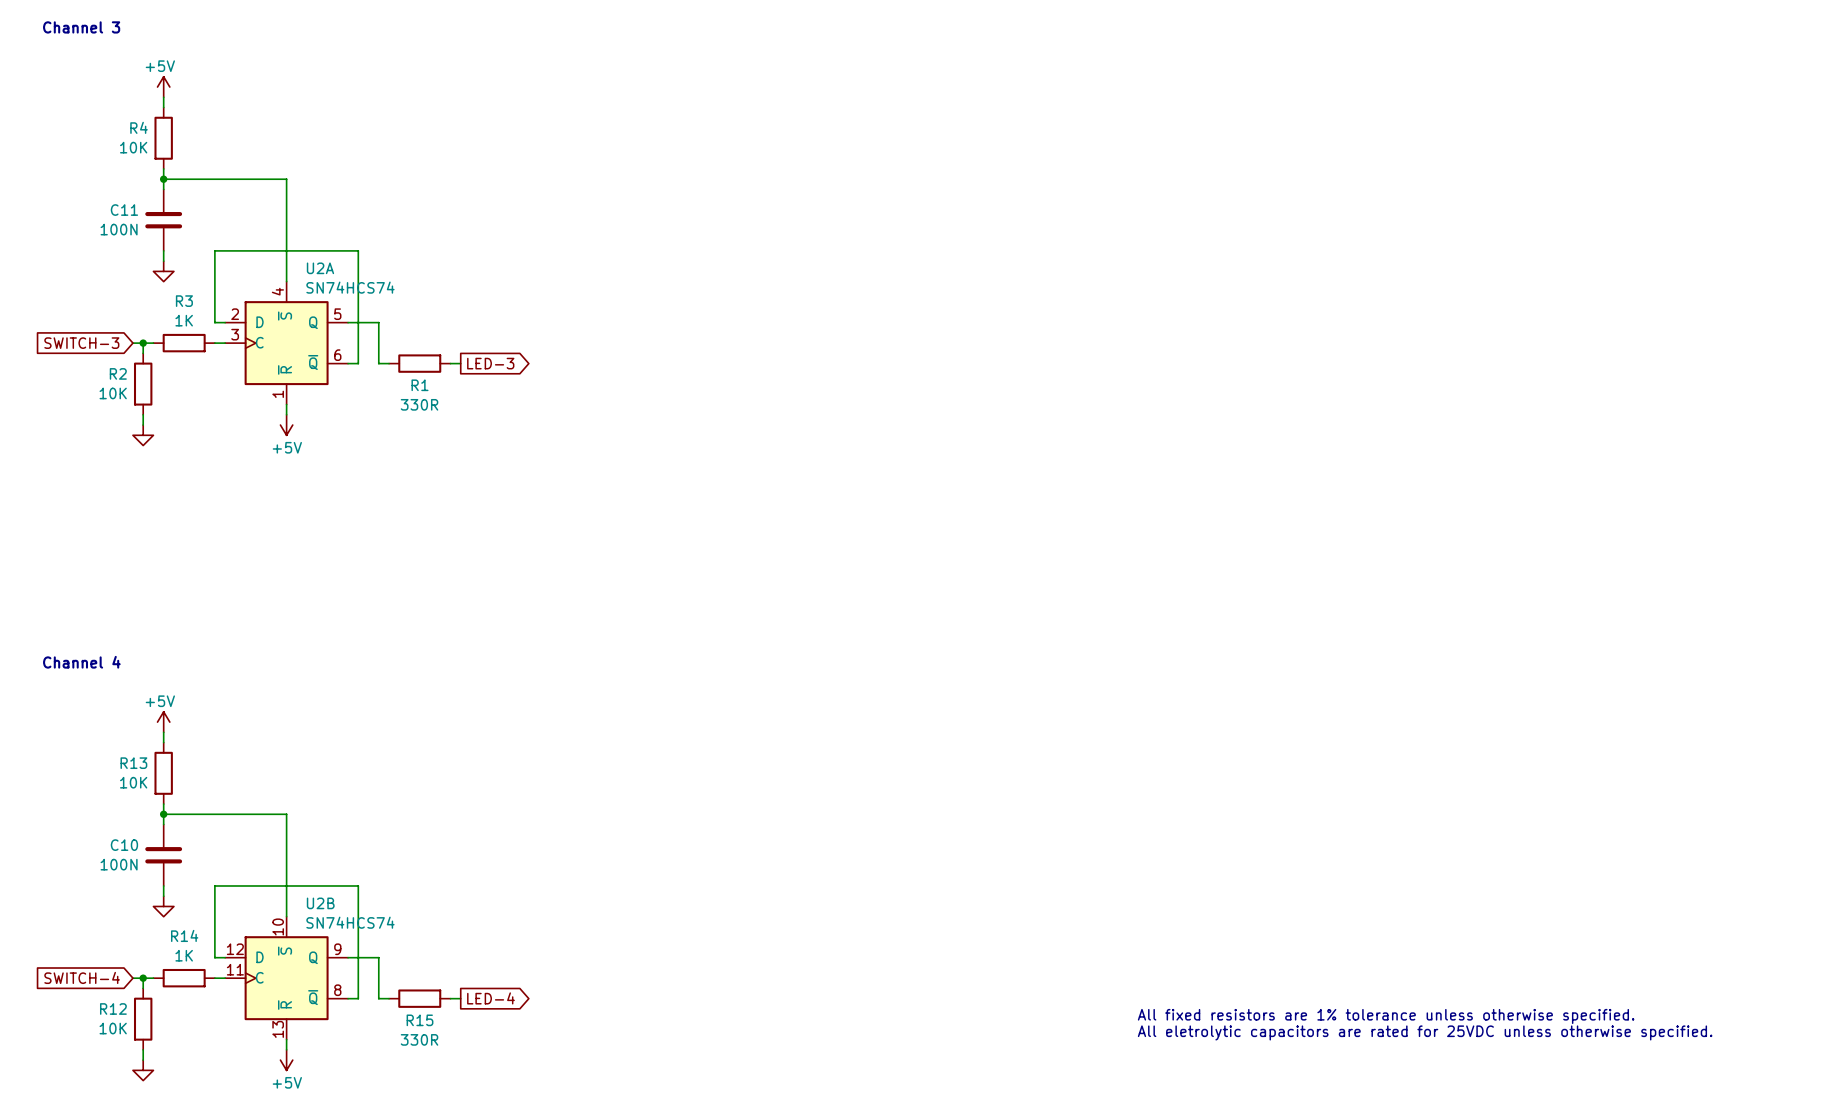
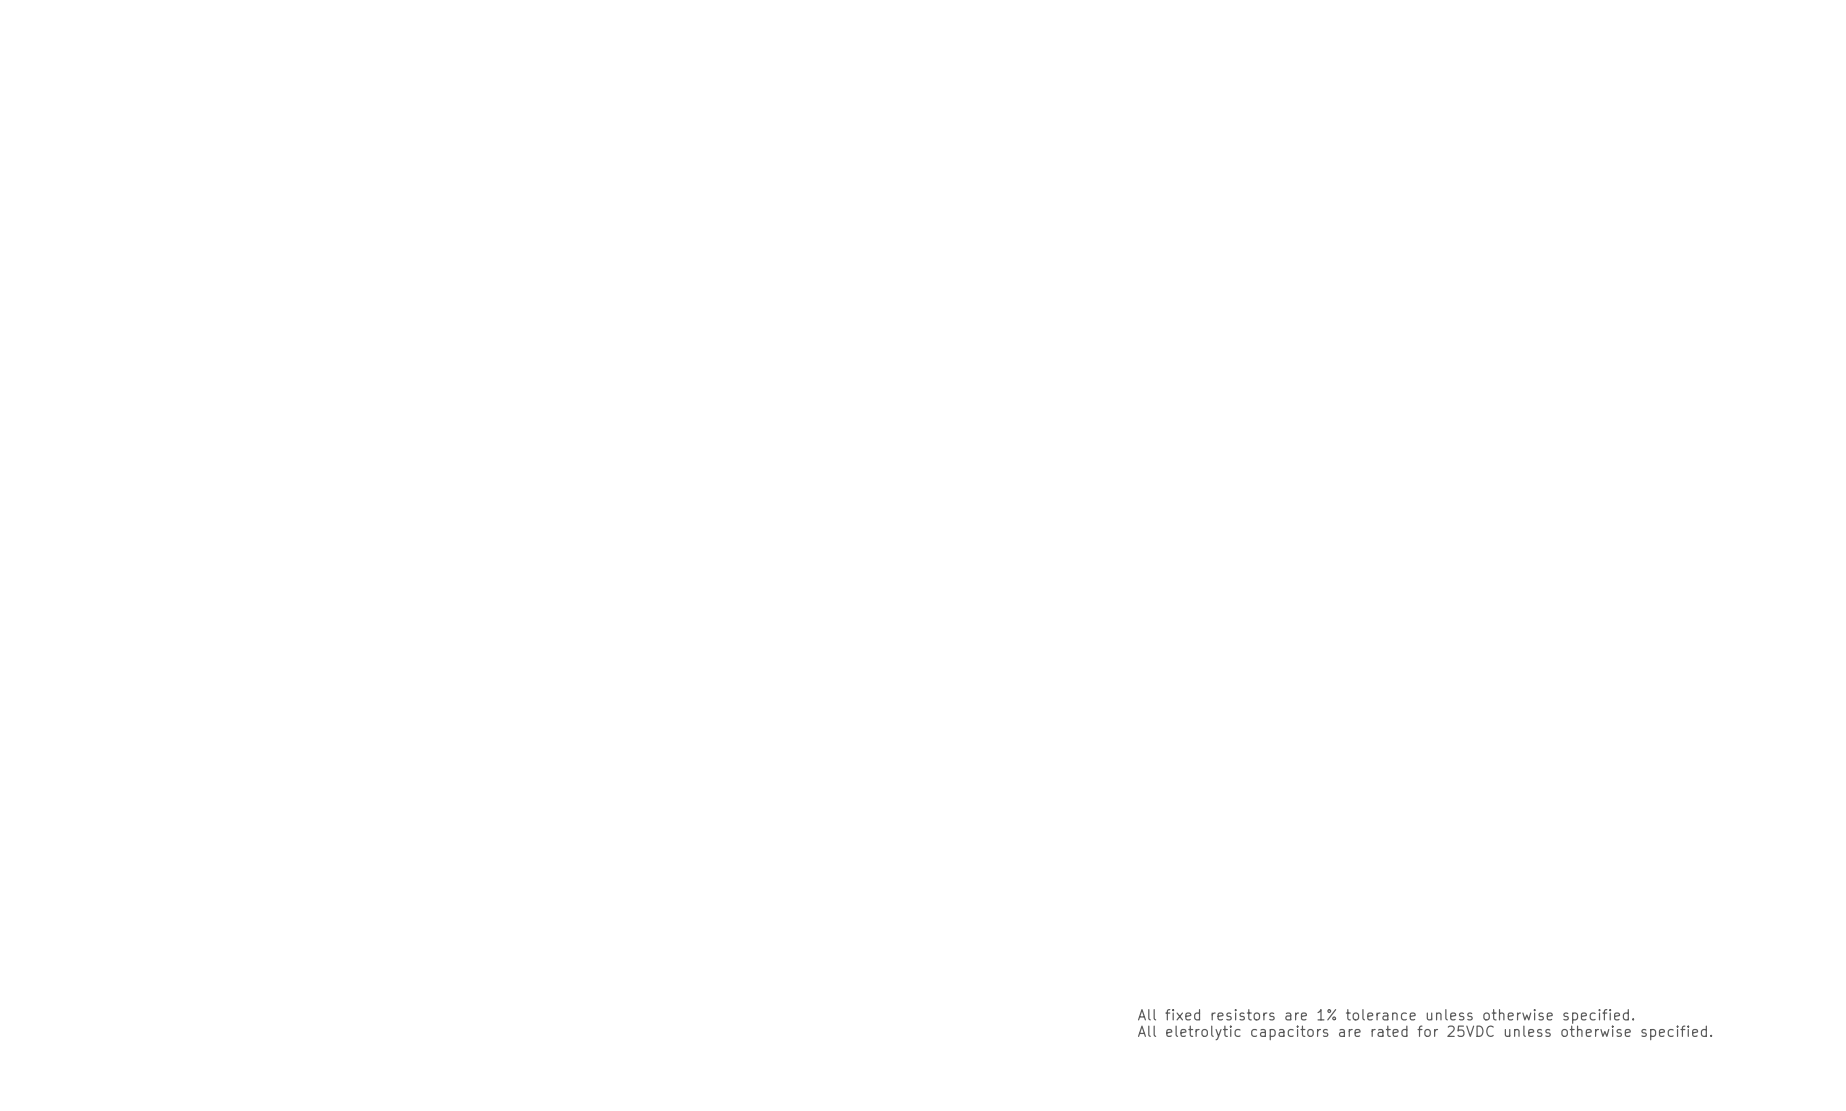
text: Channel 3 (81, 27) -> none
power symbol: +5V (163, 87) -> none
wire: (163, 97) (163, 107) -> none
R4: 10K (163, 138) -> none
wire: (163, 168) (163, 189) -> none
wire: (163, 179) (286, 179) (286, 281) -> none
junction: (163, 179) -> none
C11: 100N (163, 220) -> none
wire: (163, 250) (163, 261) -> none
power symbol: (163, 271) -> none
wire: (225, 322) (214, 322) (214, 250) (358, 250) (358, 363) (348, 363) -> none
wire: (348, 322) (378, 322) (378, 363) (389, 363) -> none
global label: SWITCH-3 (81, 343) -> none
wire: (132, 343) (153, 343) -> none
wire: (143, 343) (143, 353) -> none
junction: (143, 343) -> none
R3: 1K (184, 343) -> none
wire: (214, 343) (225, 343) -> none
U2A: SN74HCS74 (286, 343) -> none
R1: 330R (419, 363) -> none
wire: (450, 363) (460, 363) -> none
global label: LED-3 (490, 363) -> none
R2: 10K (143, 384) -> none
wire: (286, 404) (286, 414) -> none
wire: (143, 414) (143, 425) -> none
power symbol: +5V (286, 425) -> none
power symbol: (143, 435) -> none
text: Channel 4 (81, 662) -> none
power symbol: +5V (163, 722) -> none
wire: (163, 732) (163, 742) -> none
R13: 10K (163, 773) -> none
wire: (163, 804) (163, 824) -> none
wire: (163, 814) (286, 814) (286, 916) -> none
junction: (163, 814) -> none
C10: 100N (163, 855) -> none
wire: (163, 885) (163, 896) -> none
power symbol: (163, 906) -> none
wire: (225, 957) (214, 957) (214, 885) (358, 885) (358, 998) (348, 998) -> none
wire: (348, 957) (378, 957) (378, 998) (389, 998) -> none
global label: SWITCH-4 (82, 977) -> none
wire: (132, 978) (153, 978) -> none
wire: (143, 978) (143, 988) -> none
junction: (143, 978) -> none
R14: 1K (184, 978) -> none
wire: (214, 978) (225, 978) -> none
U2B: SN74HCS74 (286, 978) -> none
R15: 330R (419, 998) -> none
wire: (450, 998) (460, 998) -> none
global label: LED-4 (490, 998) -> none
R12: 10K (143, 1019) -> none
wire: (286, 1039) (286, 1049) -> none
wire: (143, 1049) (143, 1060) -> none
power symbol: +5V (286, 1060) -> none
power symbol: (143, 1070) -> none

